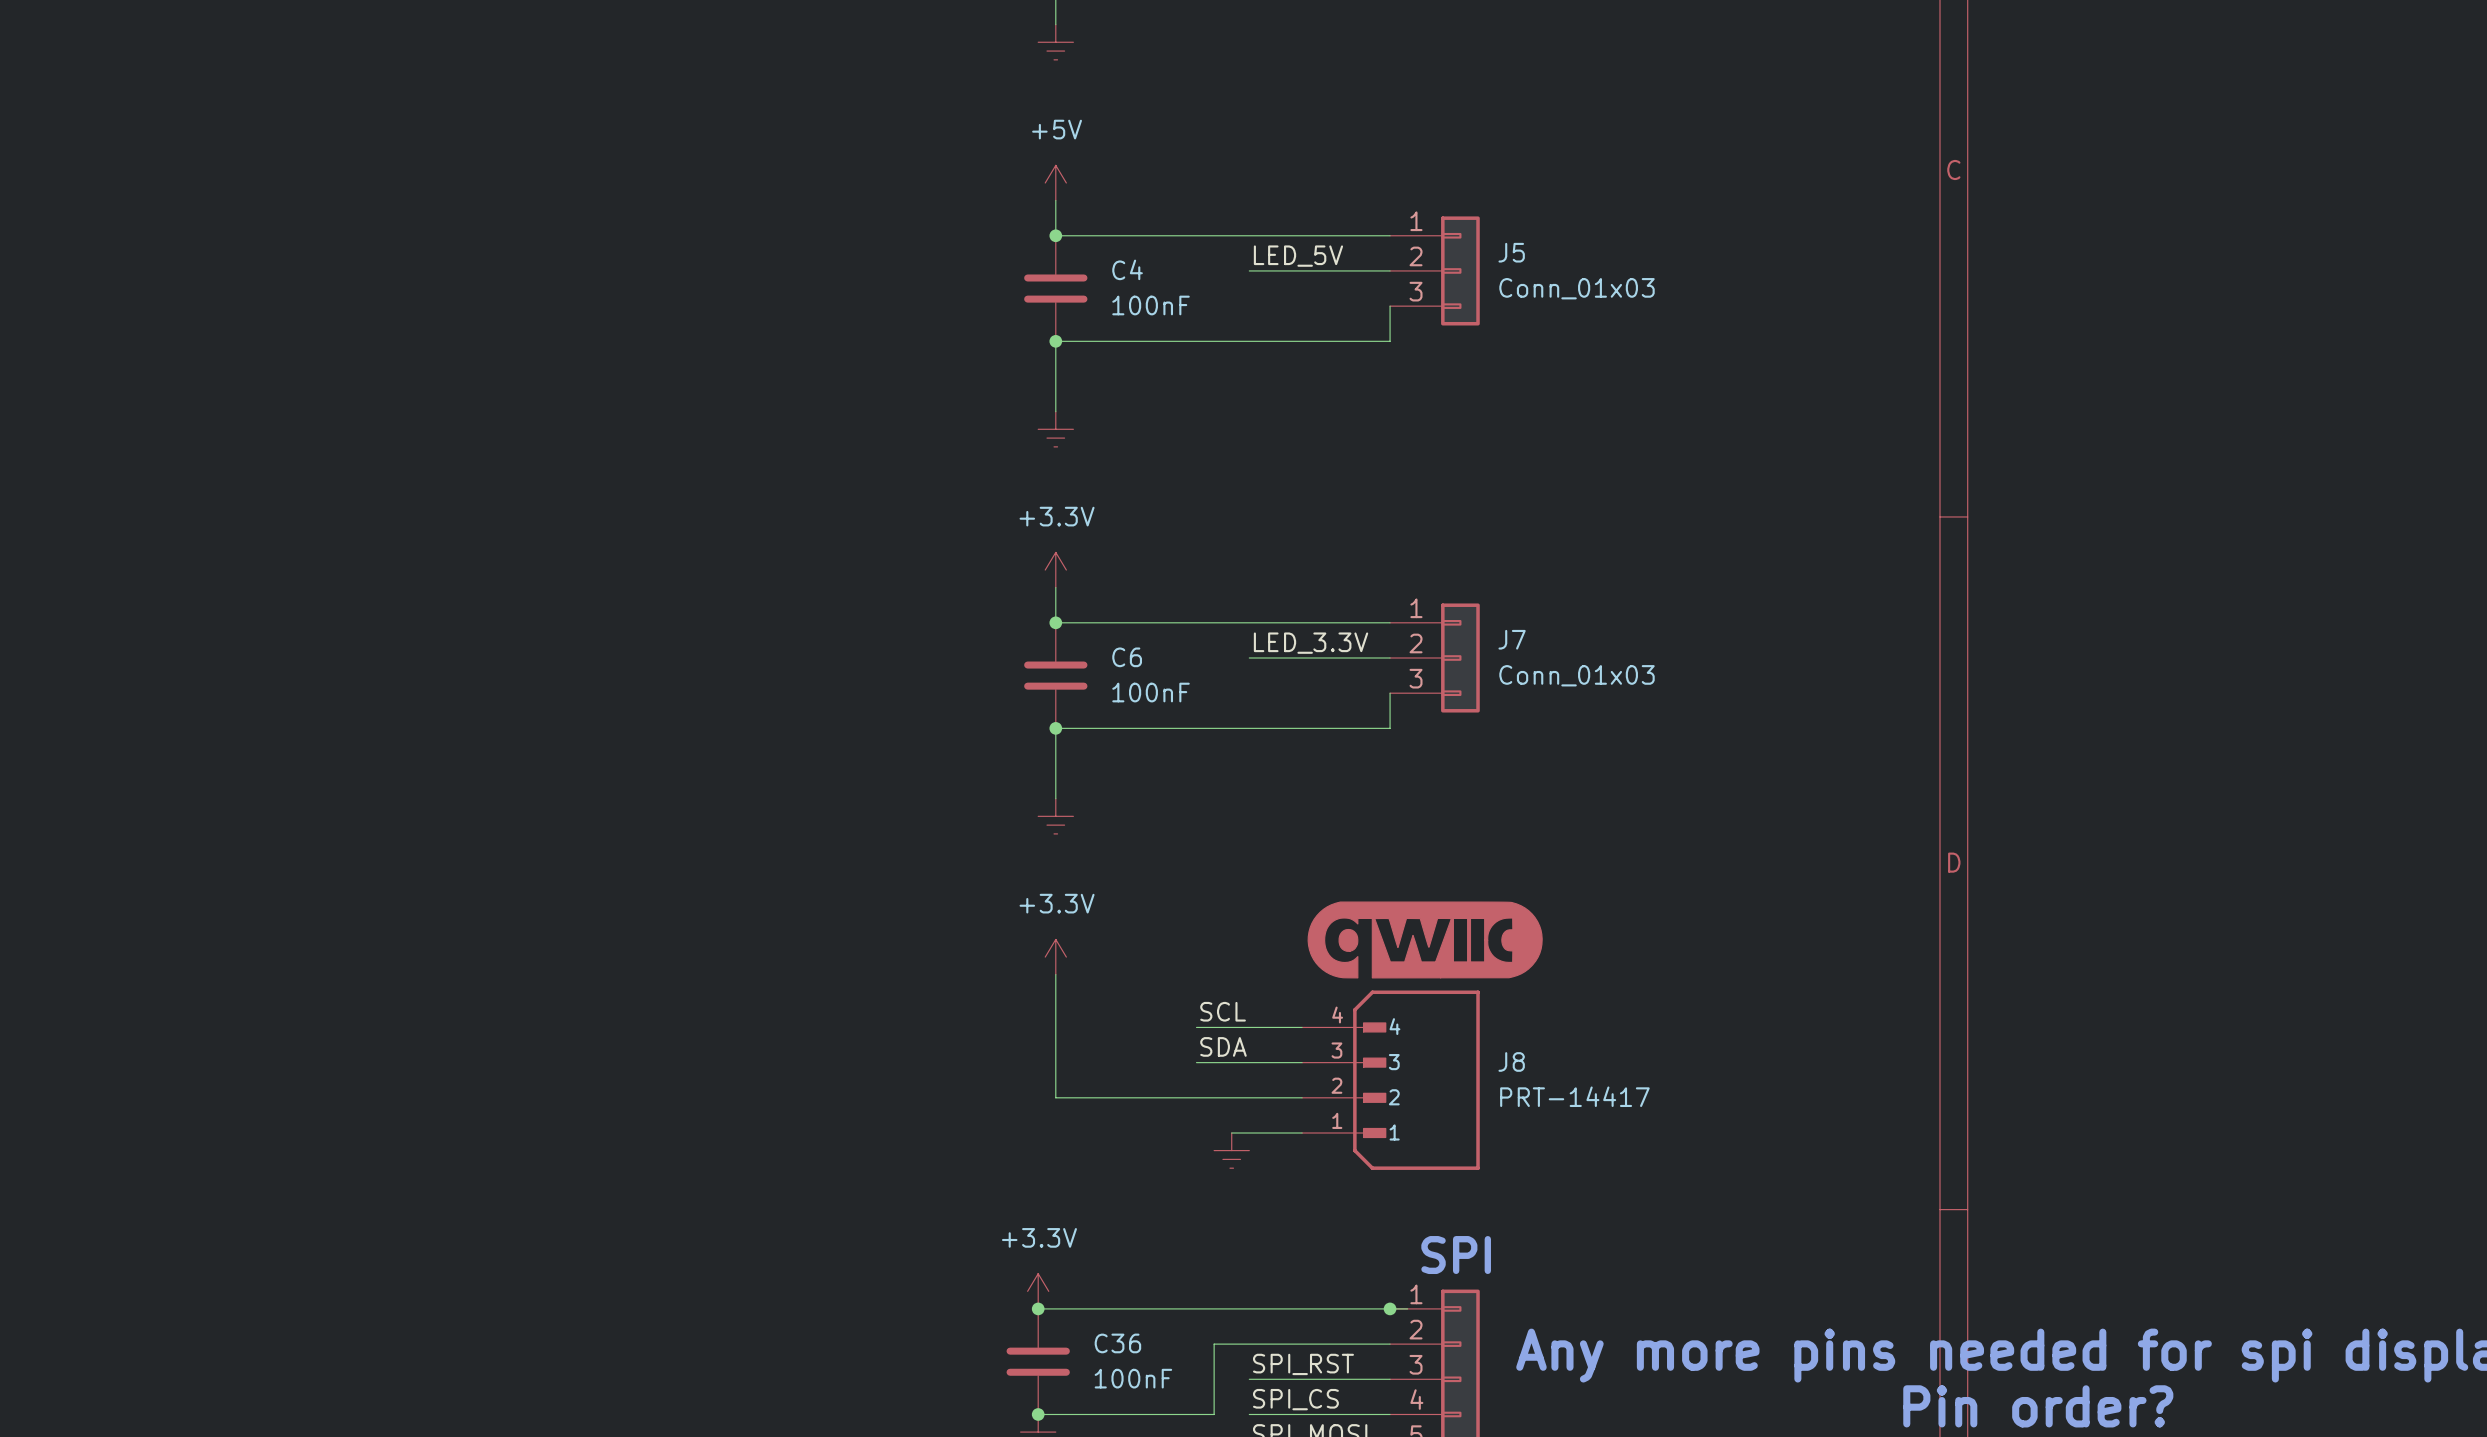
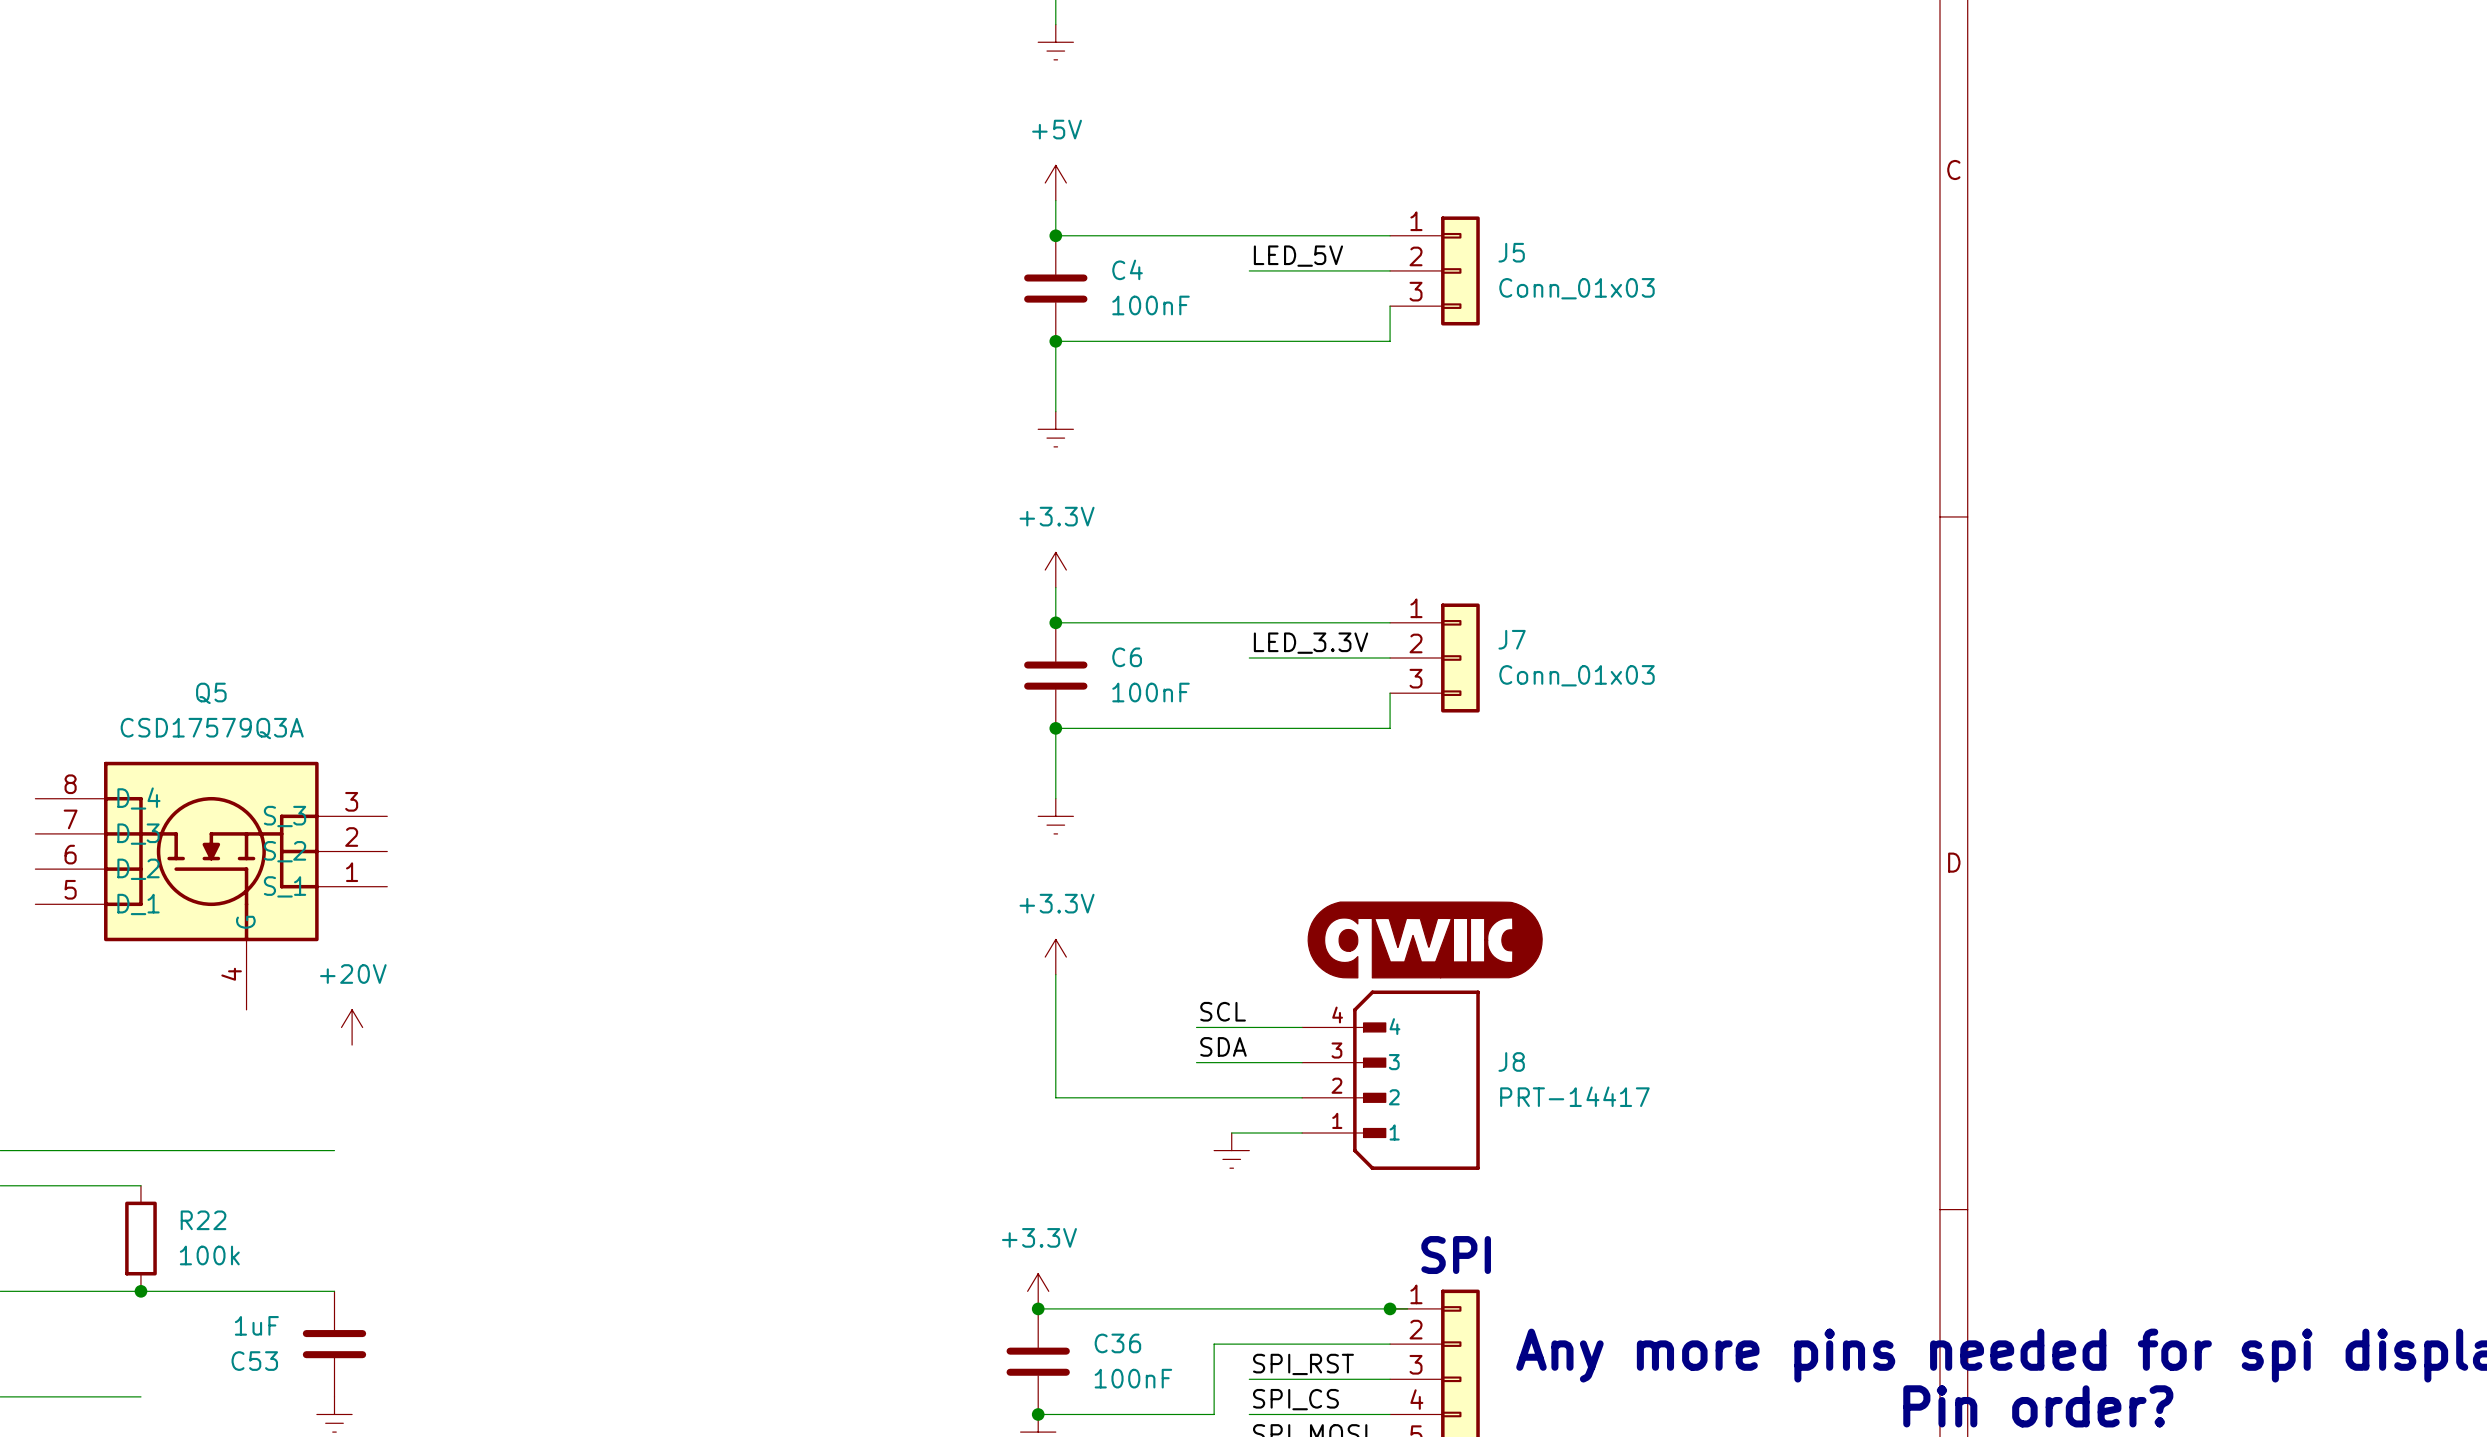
Q5: none -> CSD17579Q3A (211, 885)
power symbol: none -> +20V (352, 1027)
wire: none -> (0, 1150) (334, 1150)
wire: none -> (0, 1185) (140, 1185)
R22: none -> 100k (140, 1238)
wire: none -> (0, 1291) (334, 1291)
junction: none -> (140, 1291)
C53: none -> 1uF (334, 1344)
wire: none -> (0, 1396) (140, 1396)
power symbol: none -> (334, 1414)

